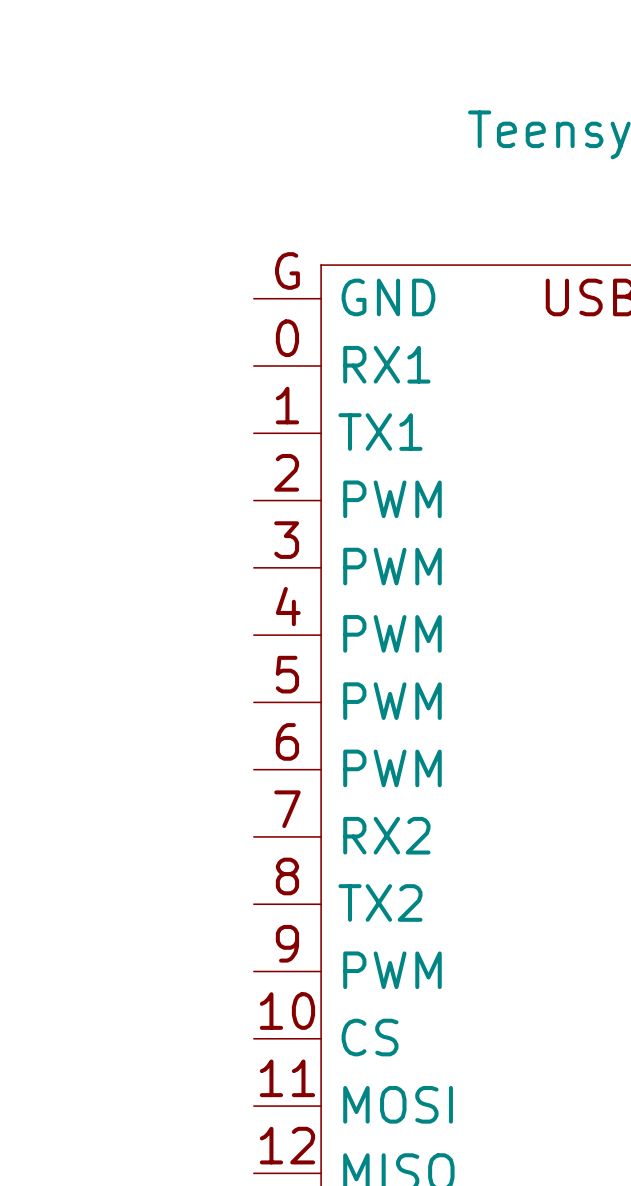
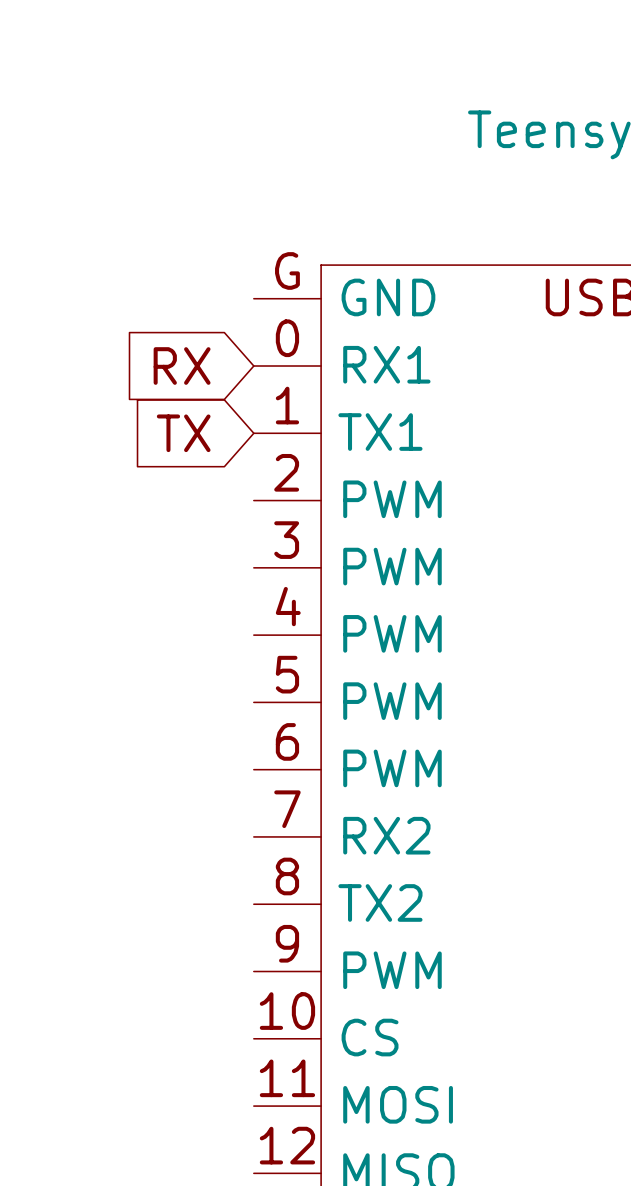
global label: none -> RX (182, 366)
global label: none -> TX (183, 433)

